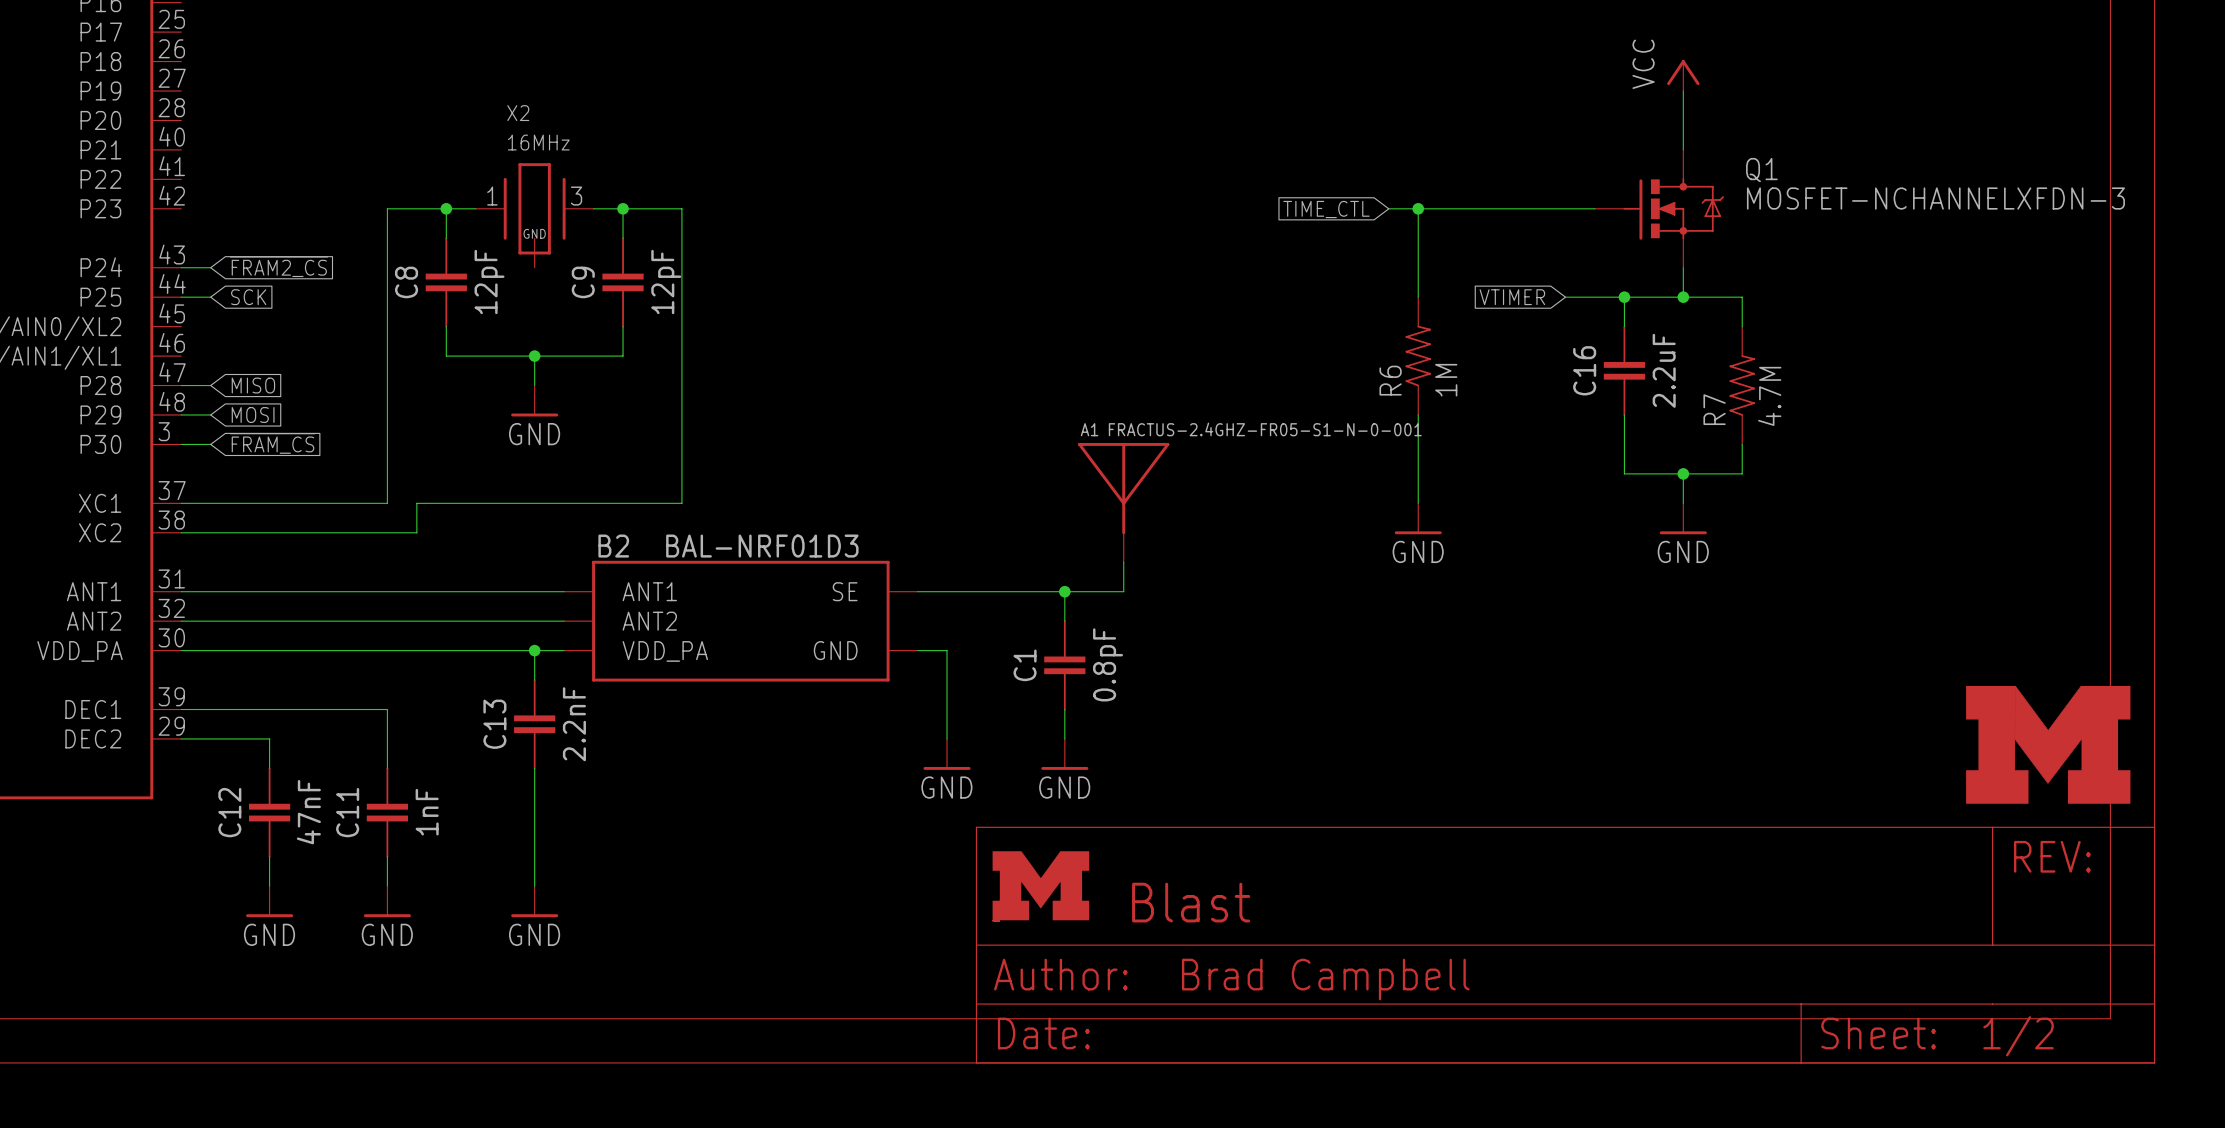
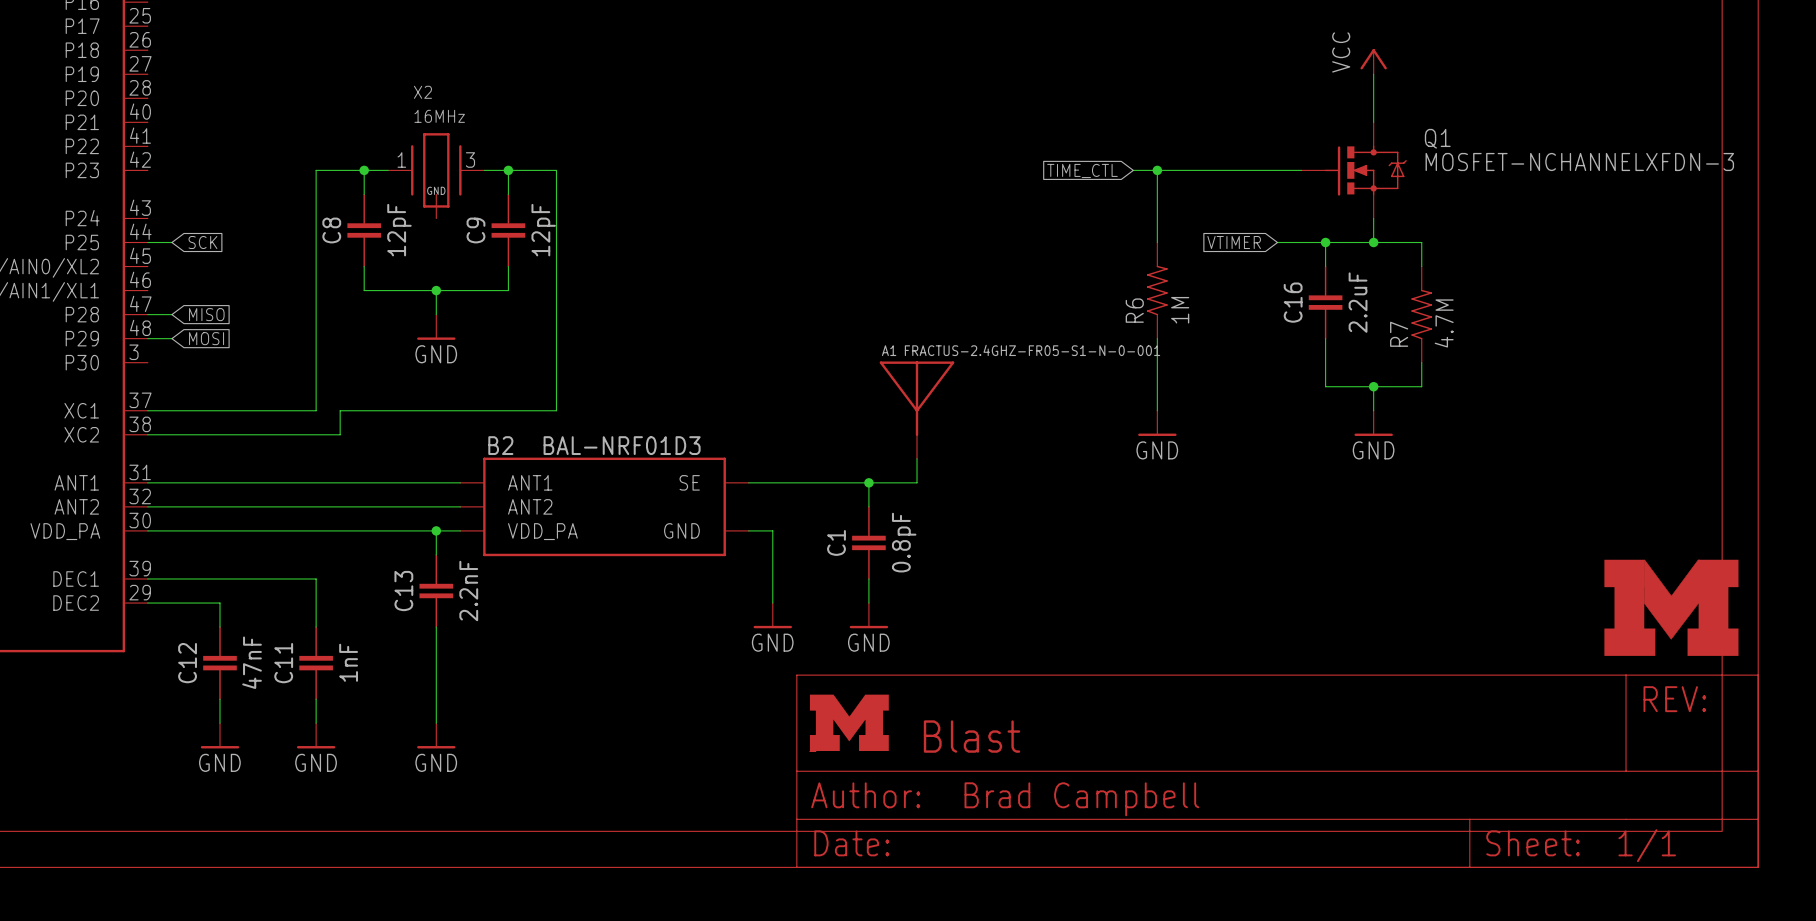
global label: ~{FRAM2_CS} (278, 266) -> none
wire: (181, 267) (210, 267) -> none
global label: ~{FRAM_CS} (272, 443) -> none
wire: (181, 444) (210, 444) -> none
part text: 1/2 (2018, 1036) -> 1/1 (1647, 845)

